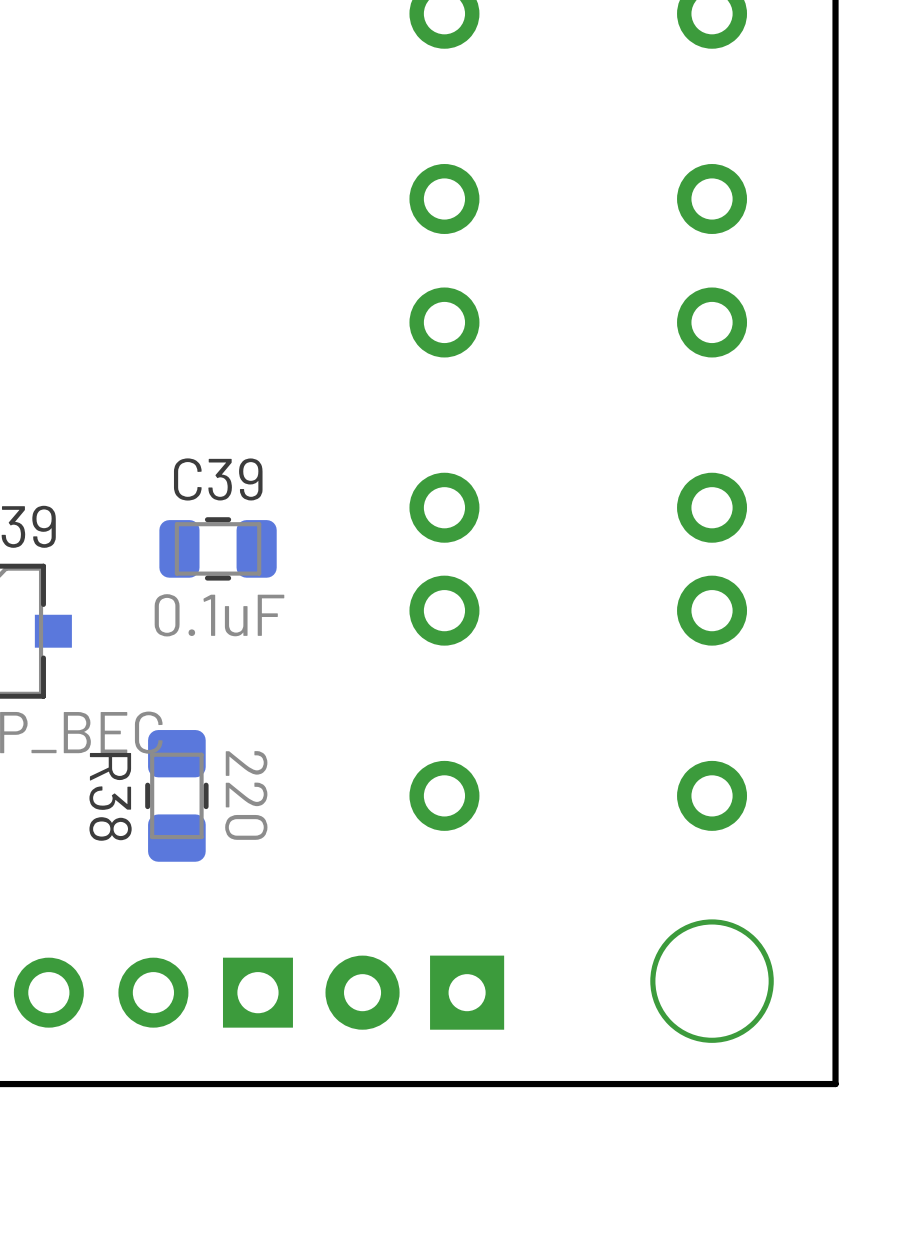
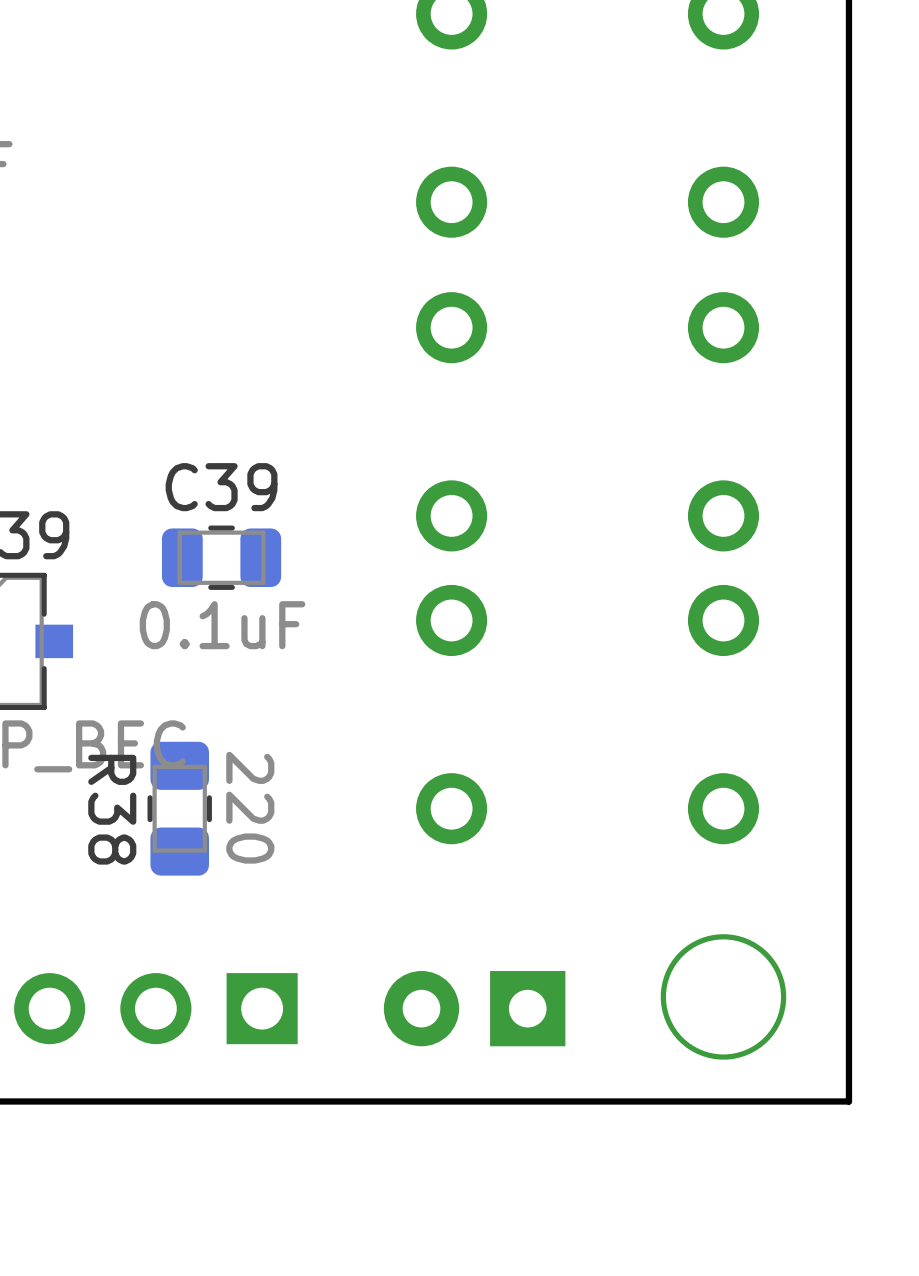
part position: (414, 992) -> (474, 1008)

